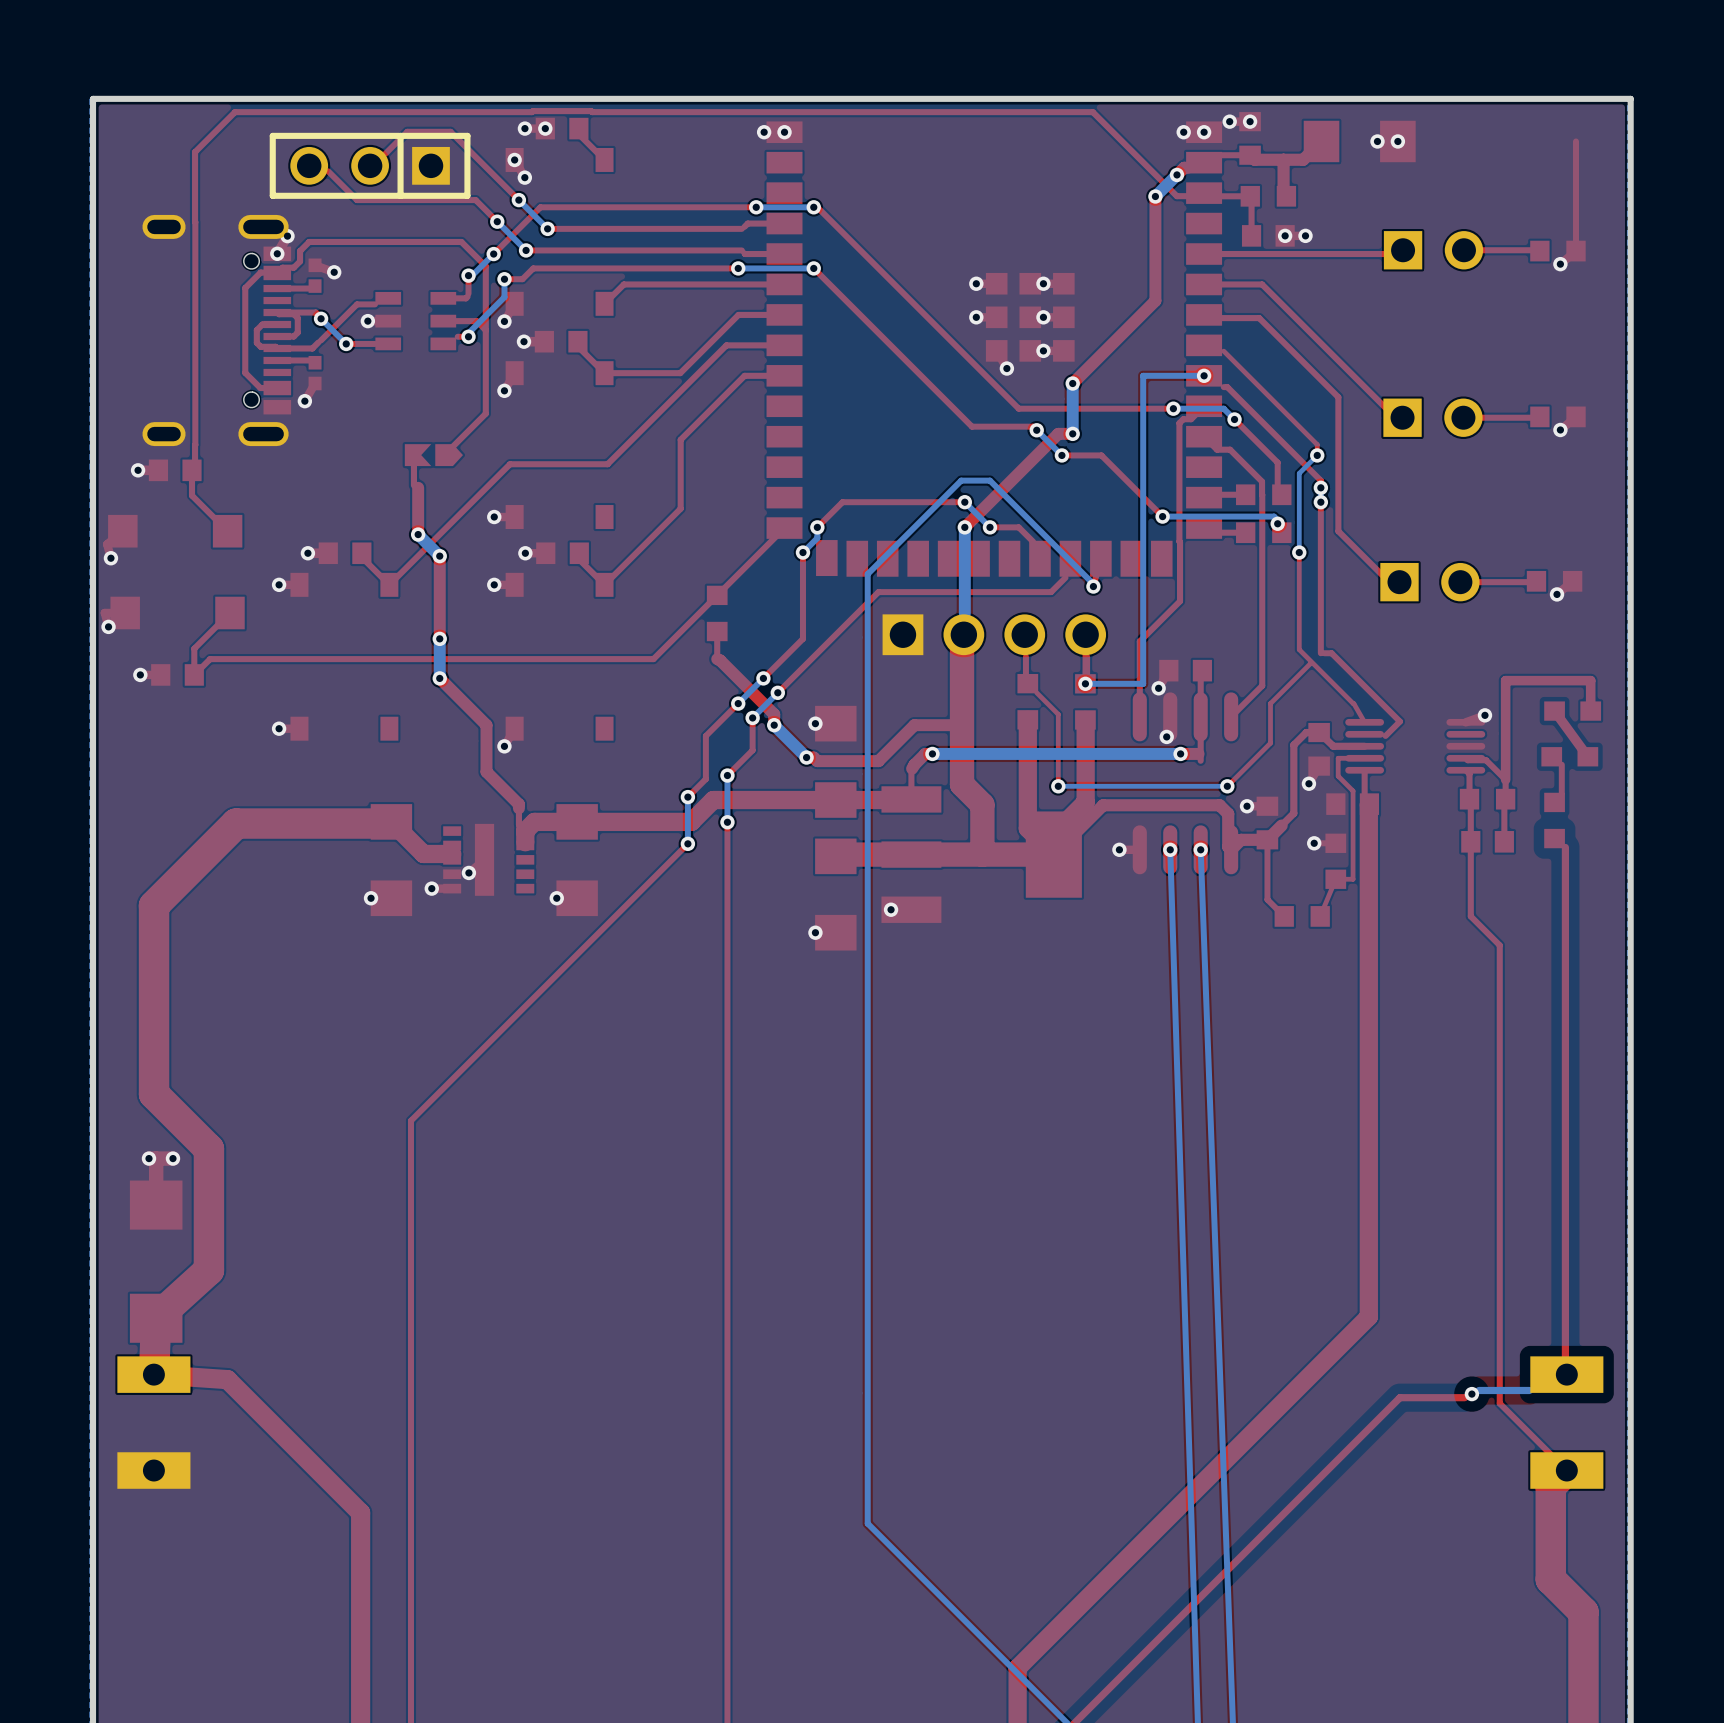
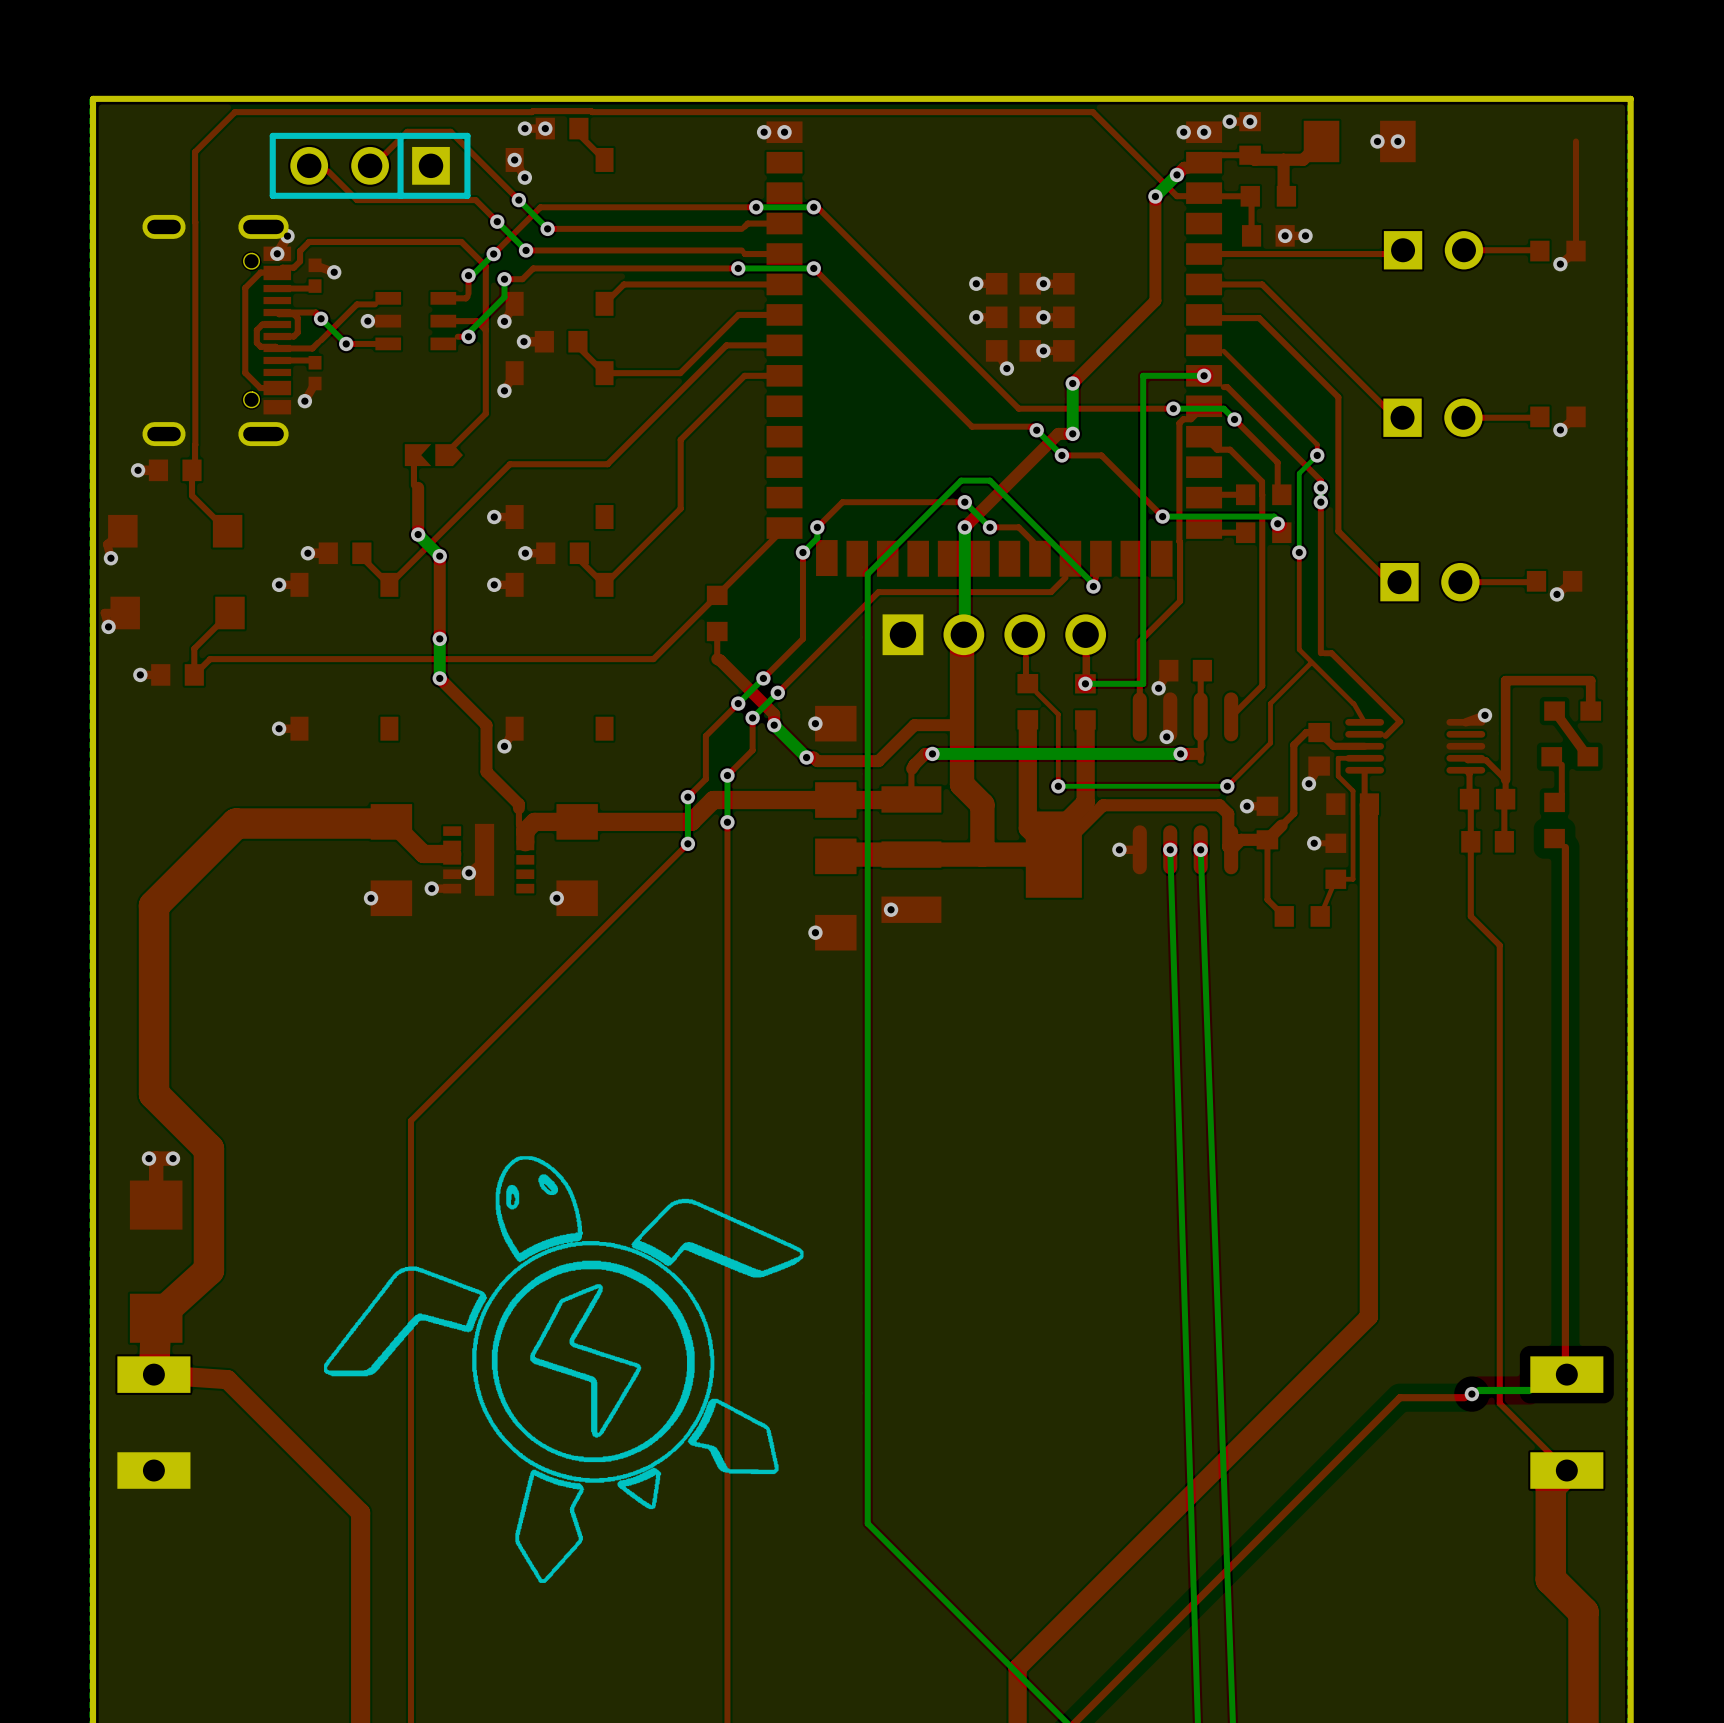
drawing: none -> [324, 1156, 804, 1583]

